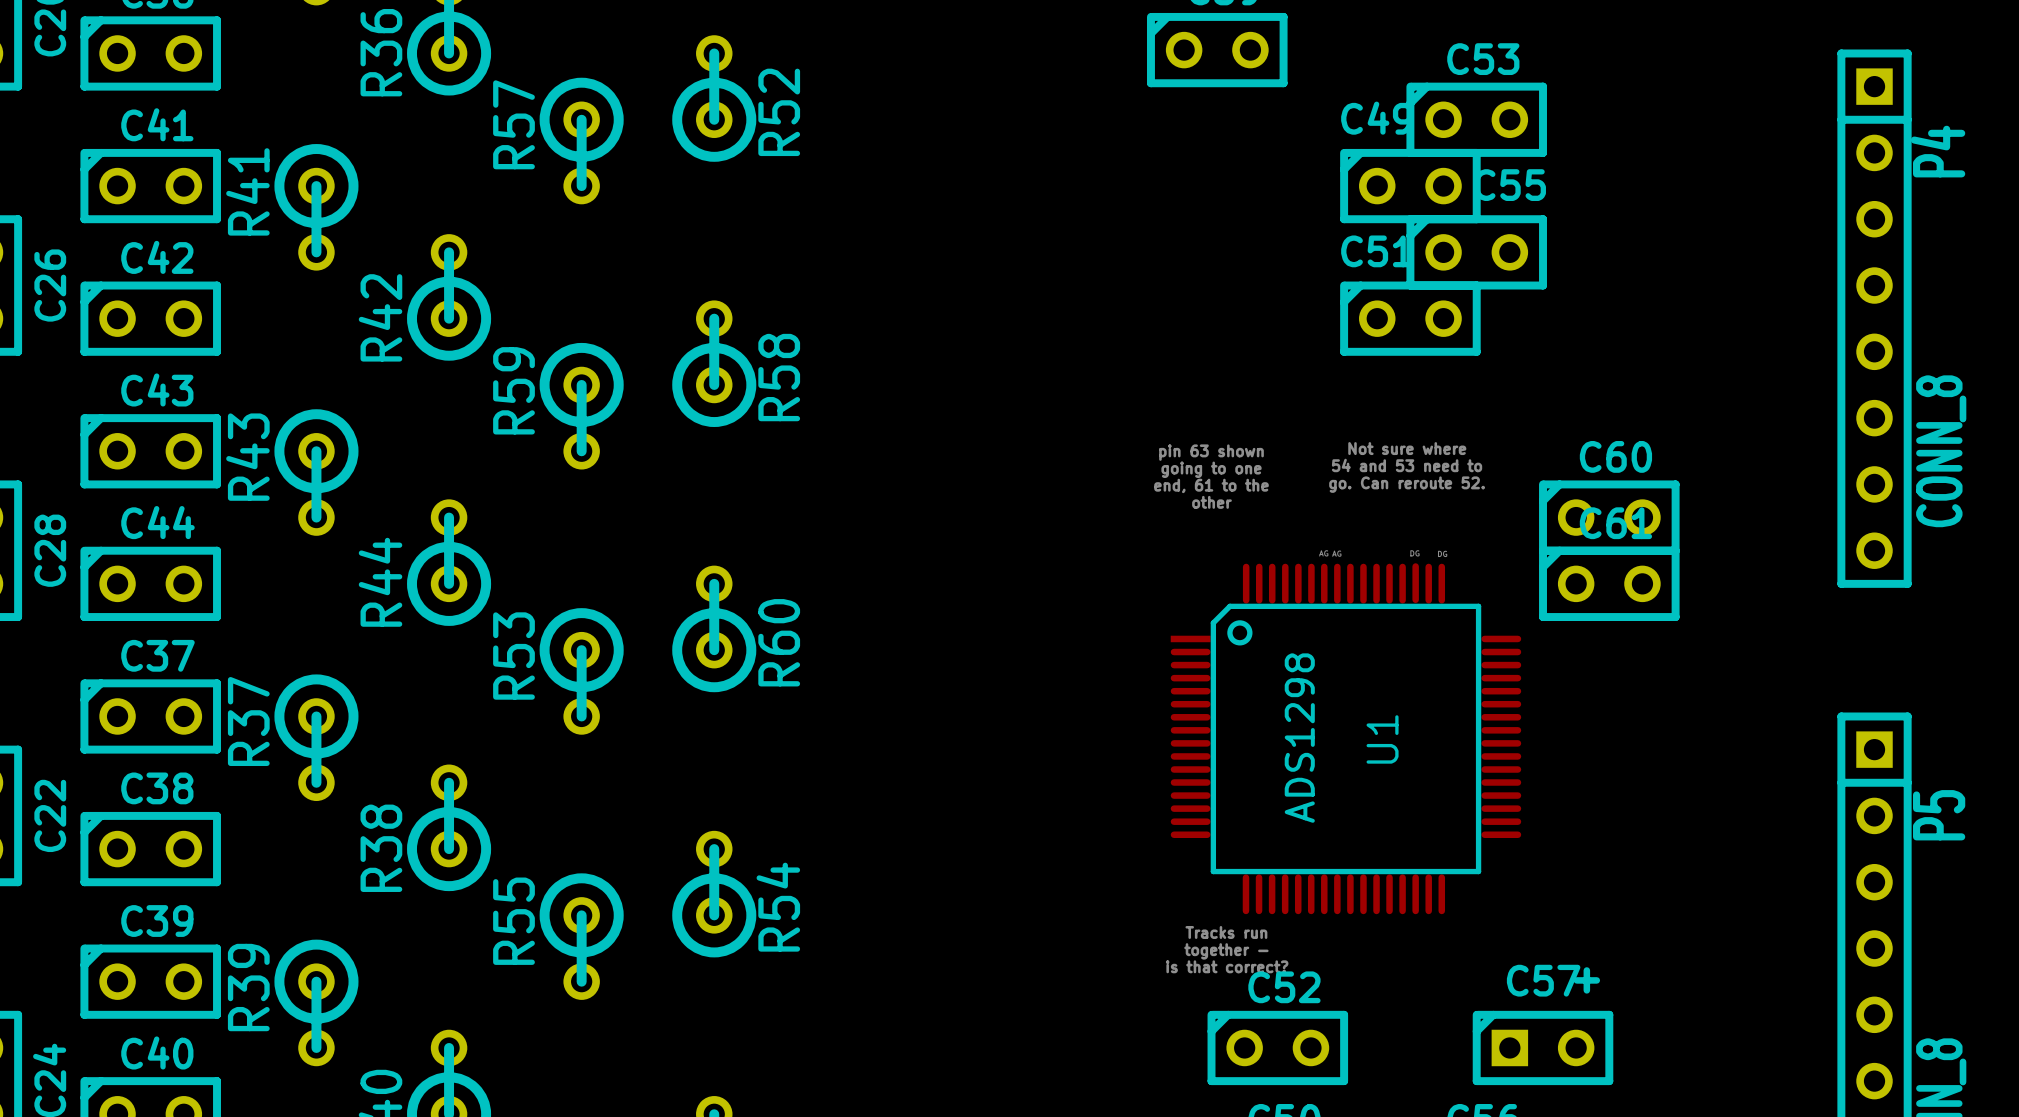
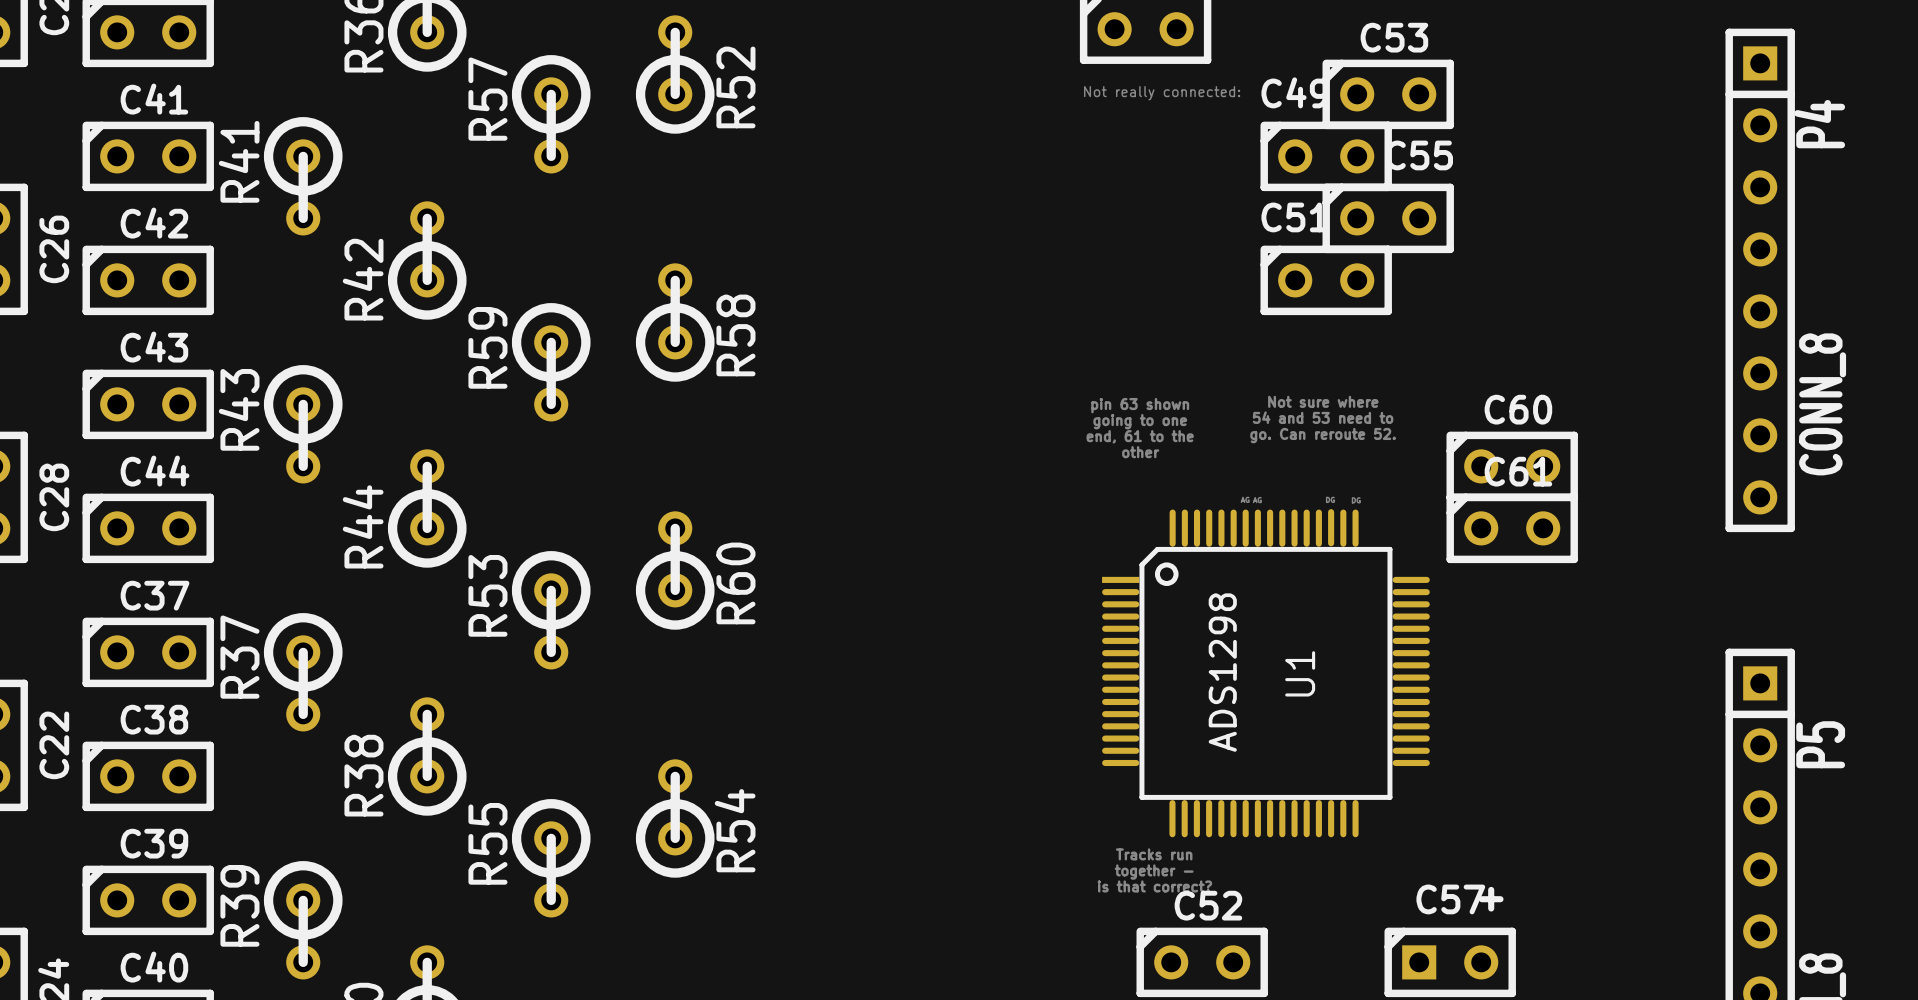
text: none -> Not really connected: (1162, 93)

